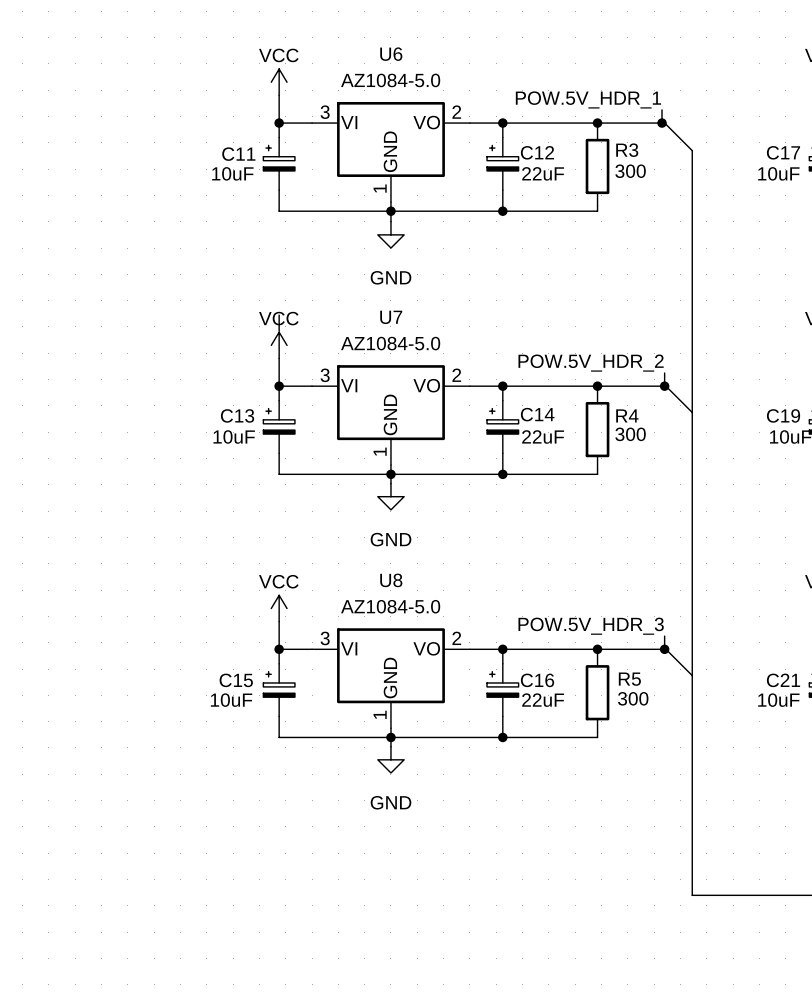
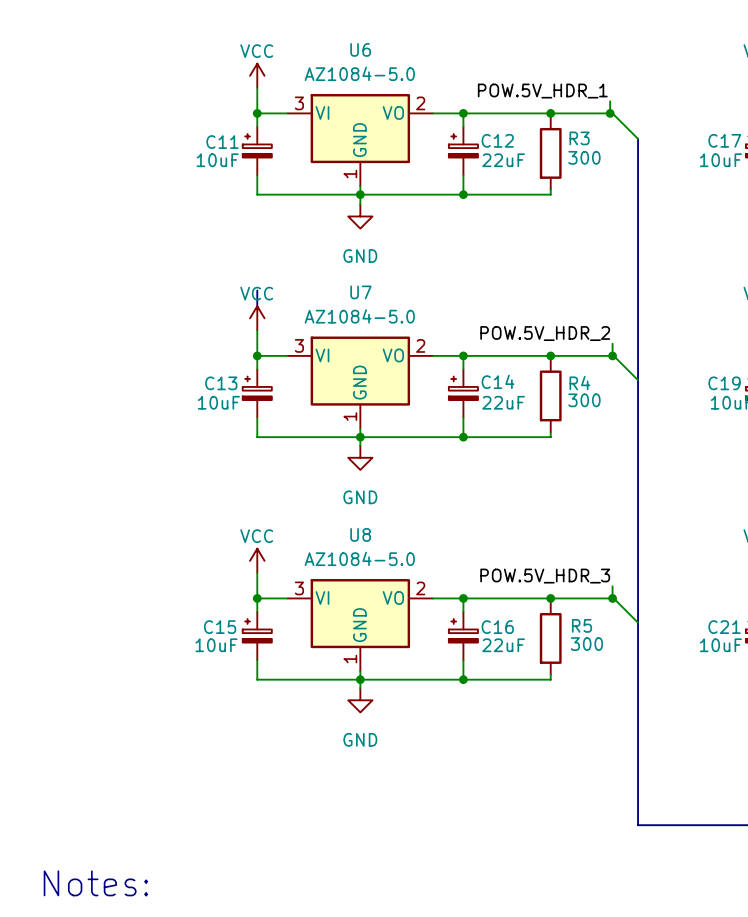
text: none -> Notes: (95, 883)

